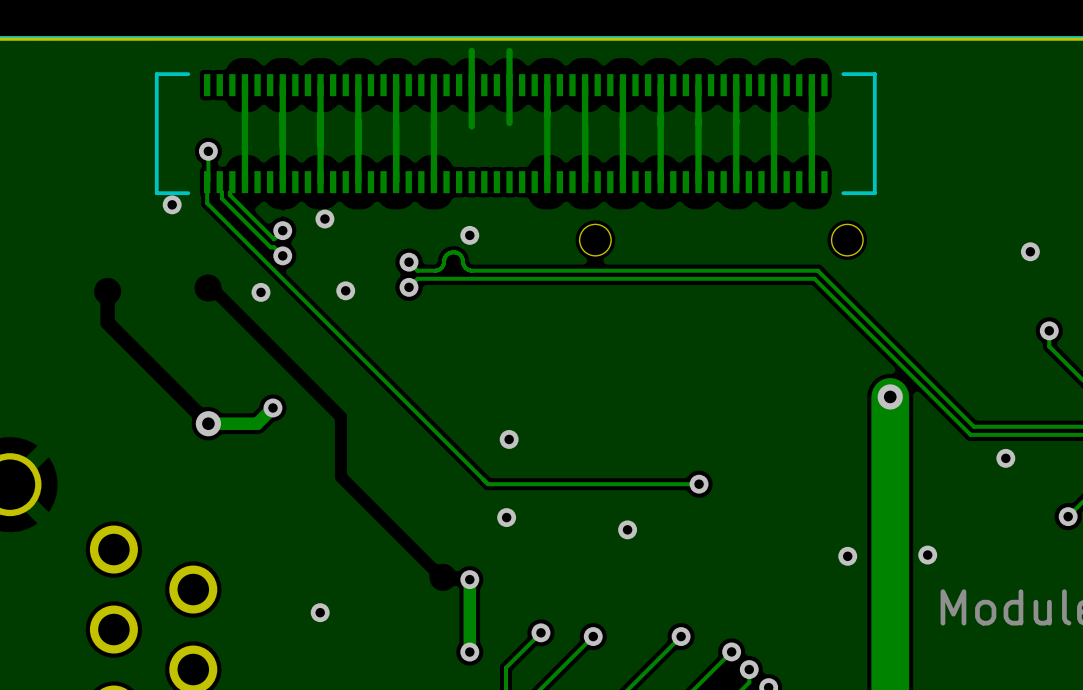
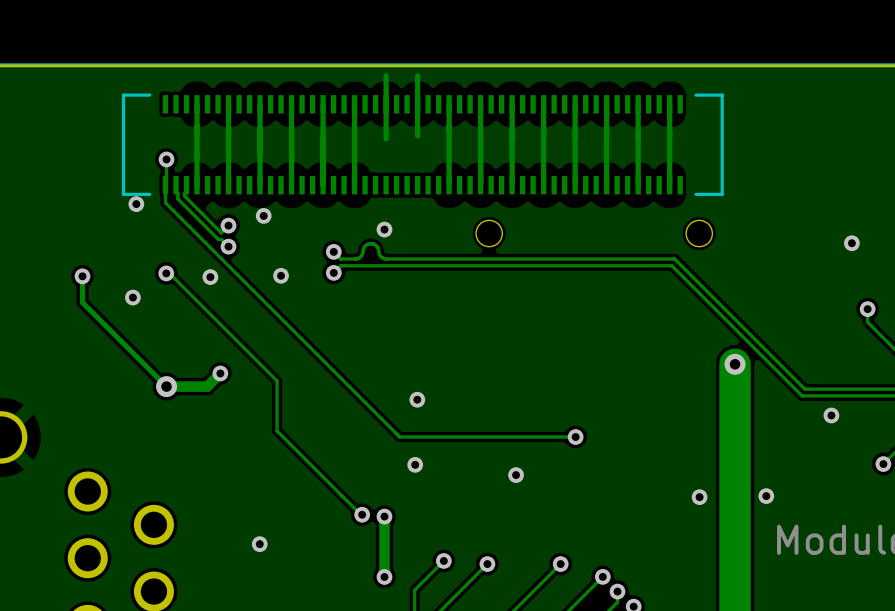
track: none -> (166, 273) (169, 273) (277, 380) (277, 430) (362, 514)
via: none -> (166, 273)
track: none -> (82, 276) (82, 302) (166, 386)
via: none -> (82, 276)
via: none -> (132, 297)
via: none -> (362, 514)

